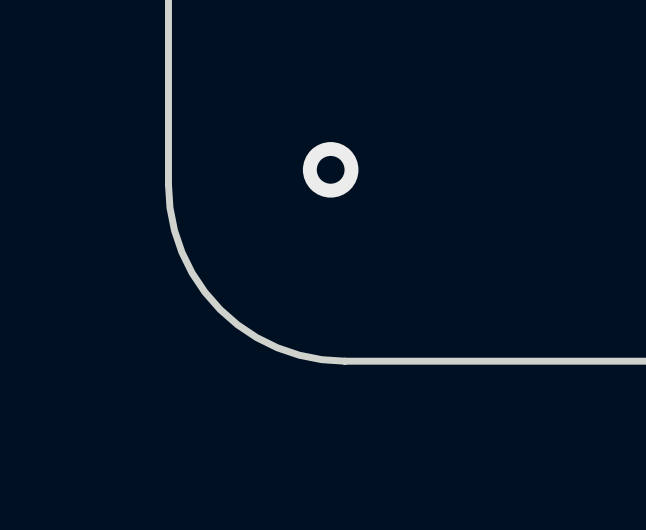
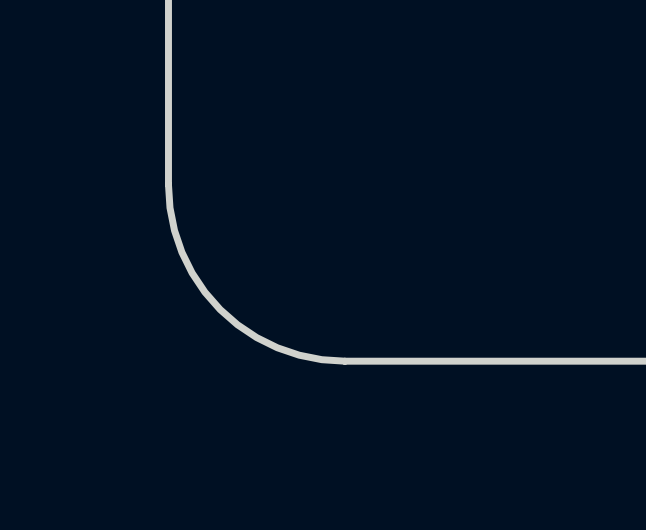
via: (330, 169) -> none

